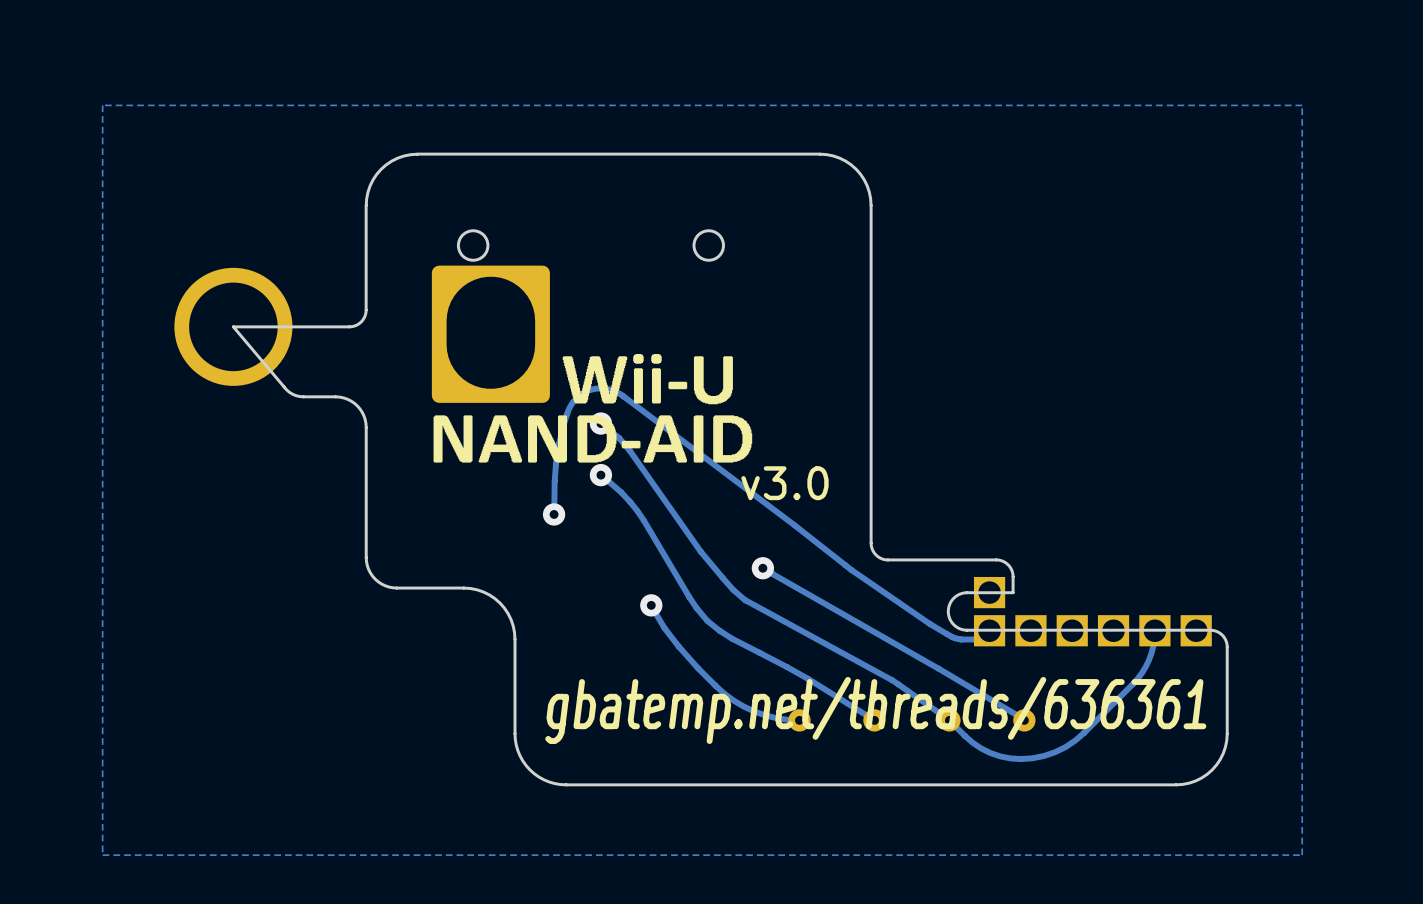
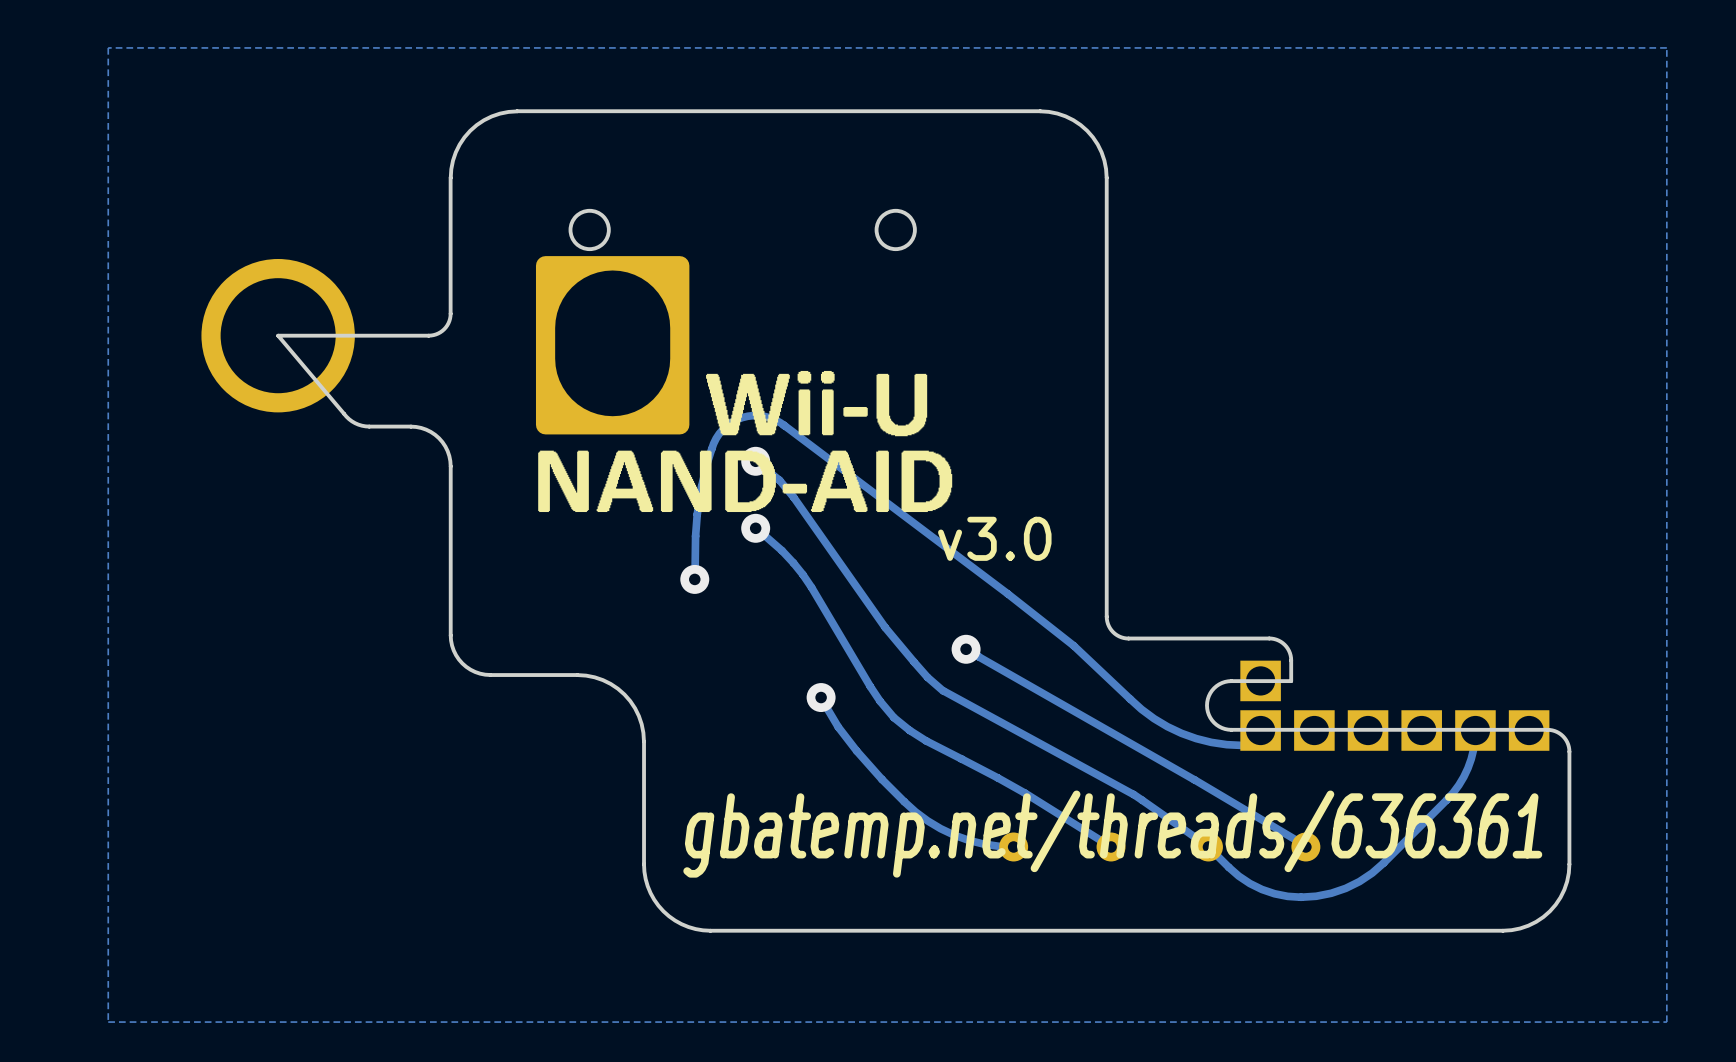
track: (845, 565) (929, 624) (951, 636) (961, 639) (975, 639) -> (1073, 645) (1130, 699)
track: none -> (1129, 698) (1154, 718) (1181, 733) (1211, 742) (1242, 745)

